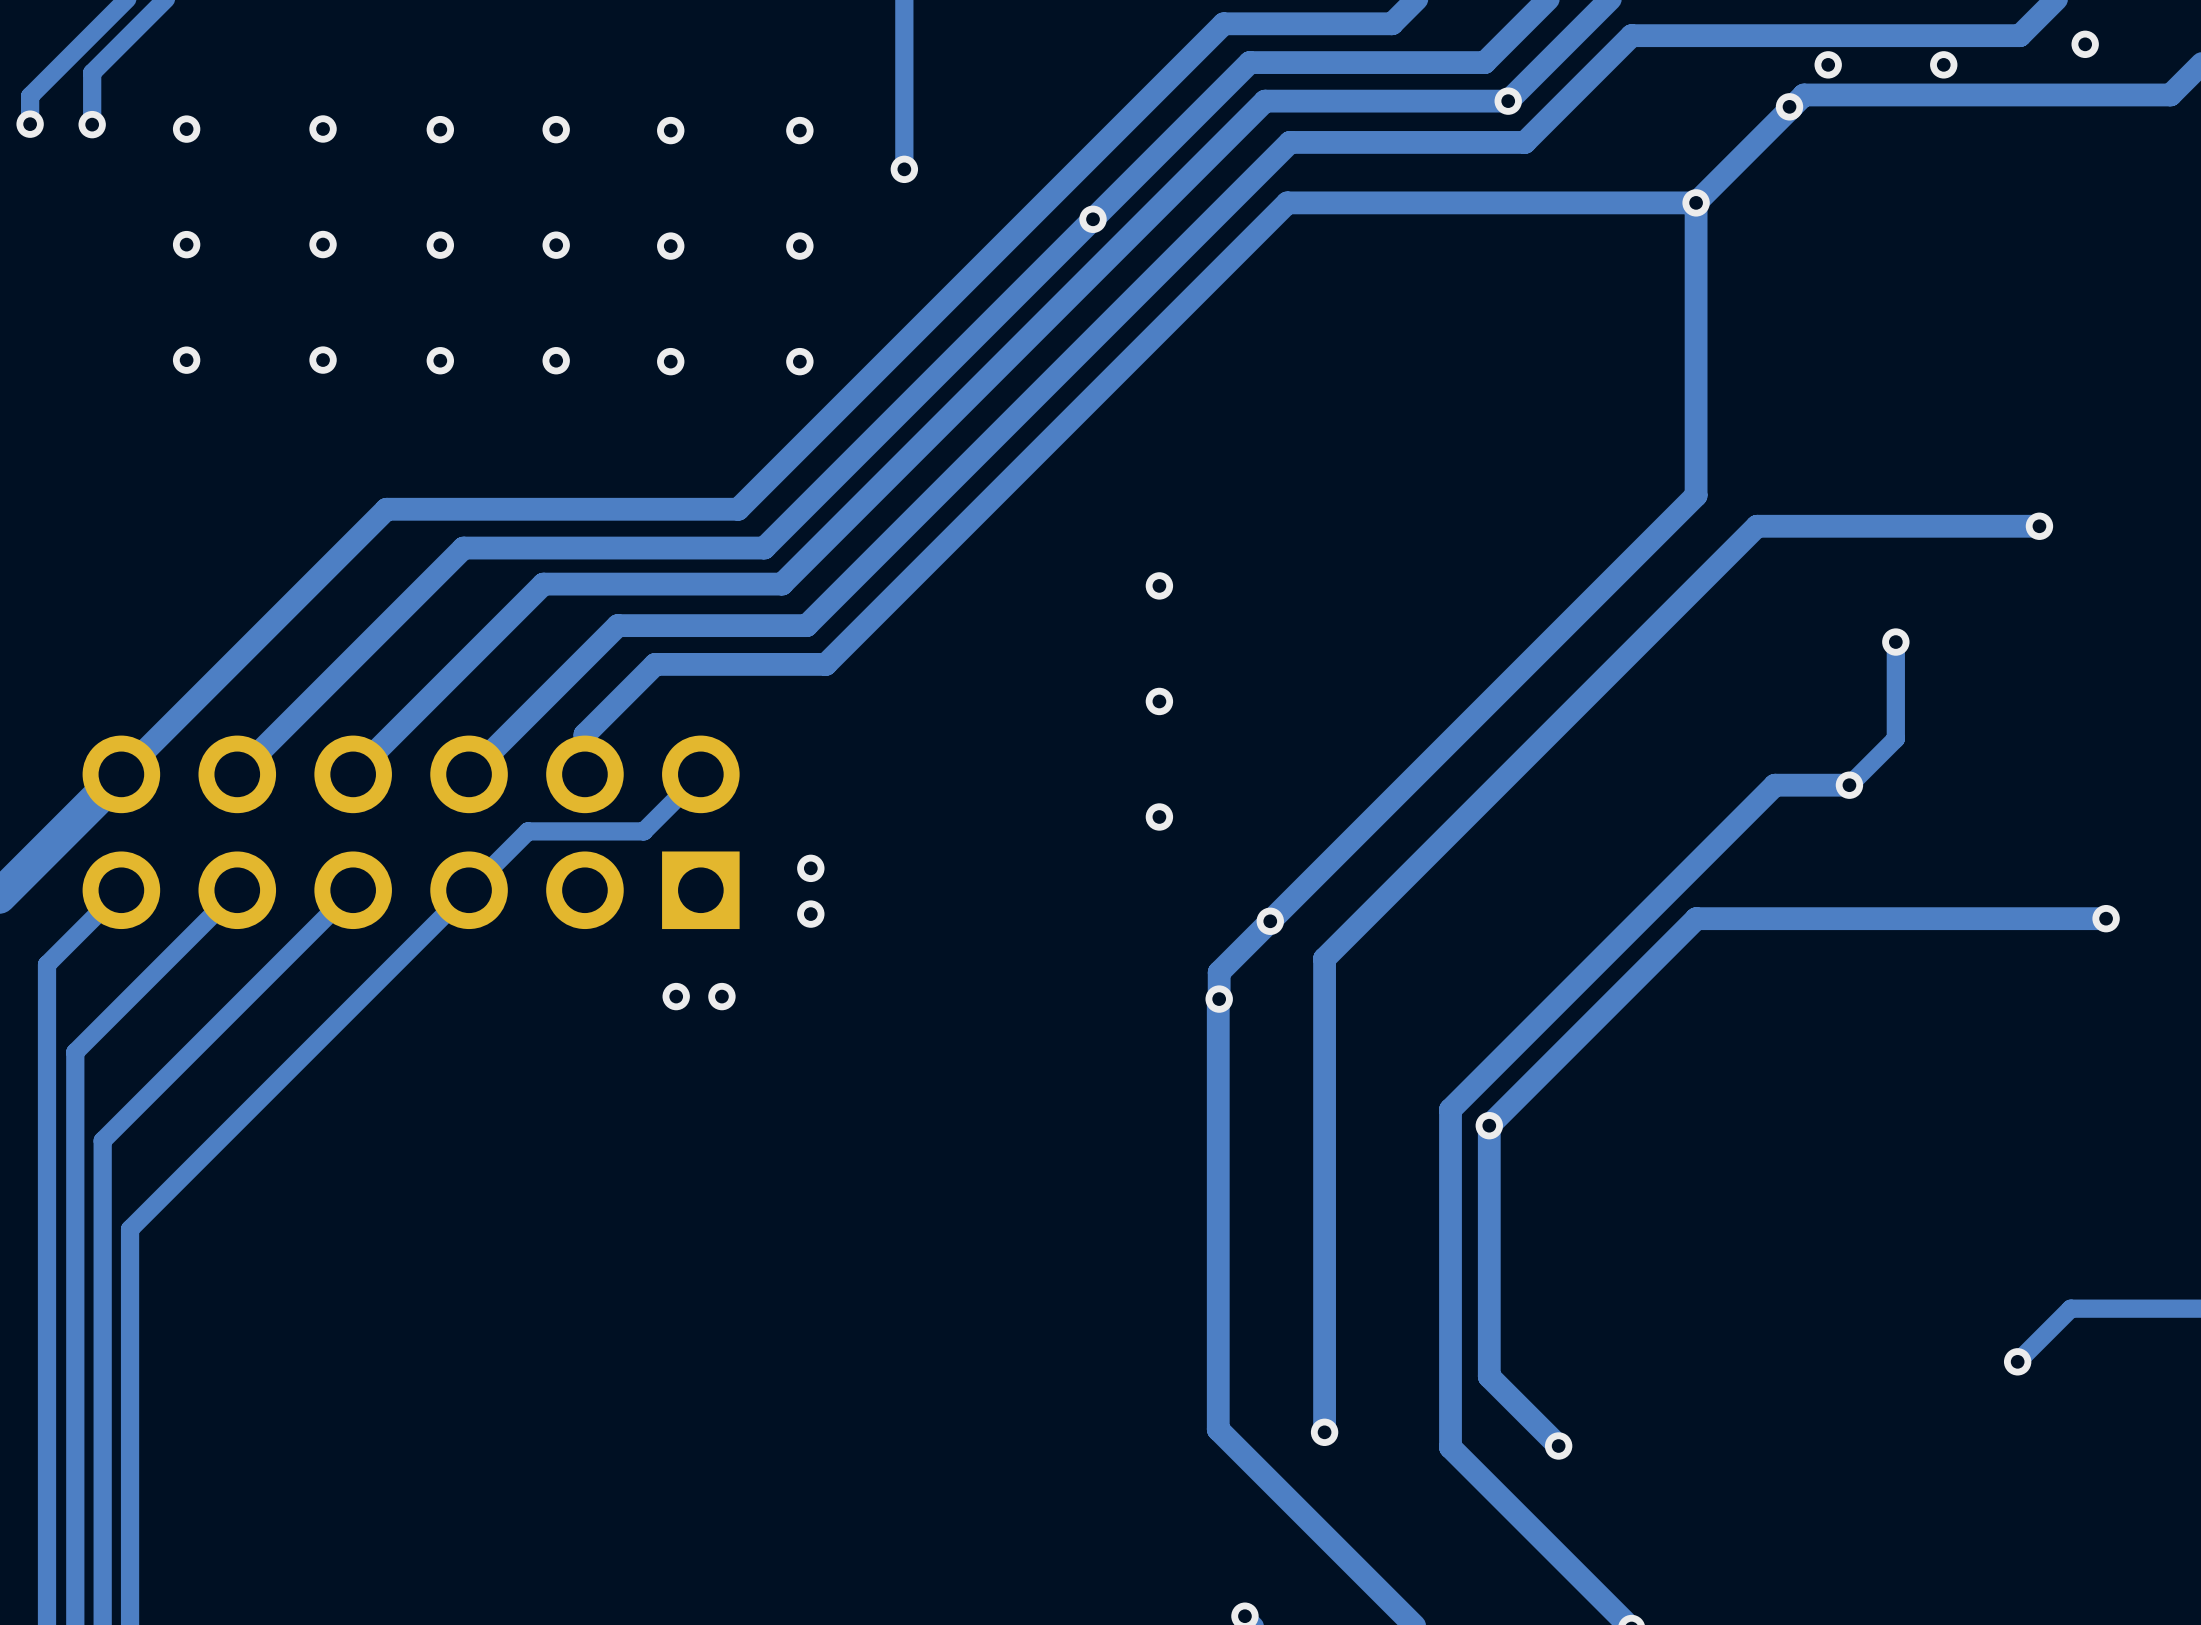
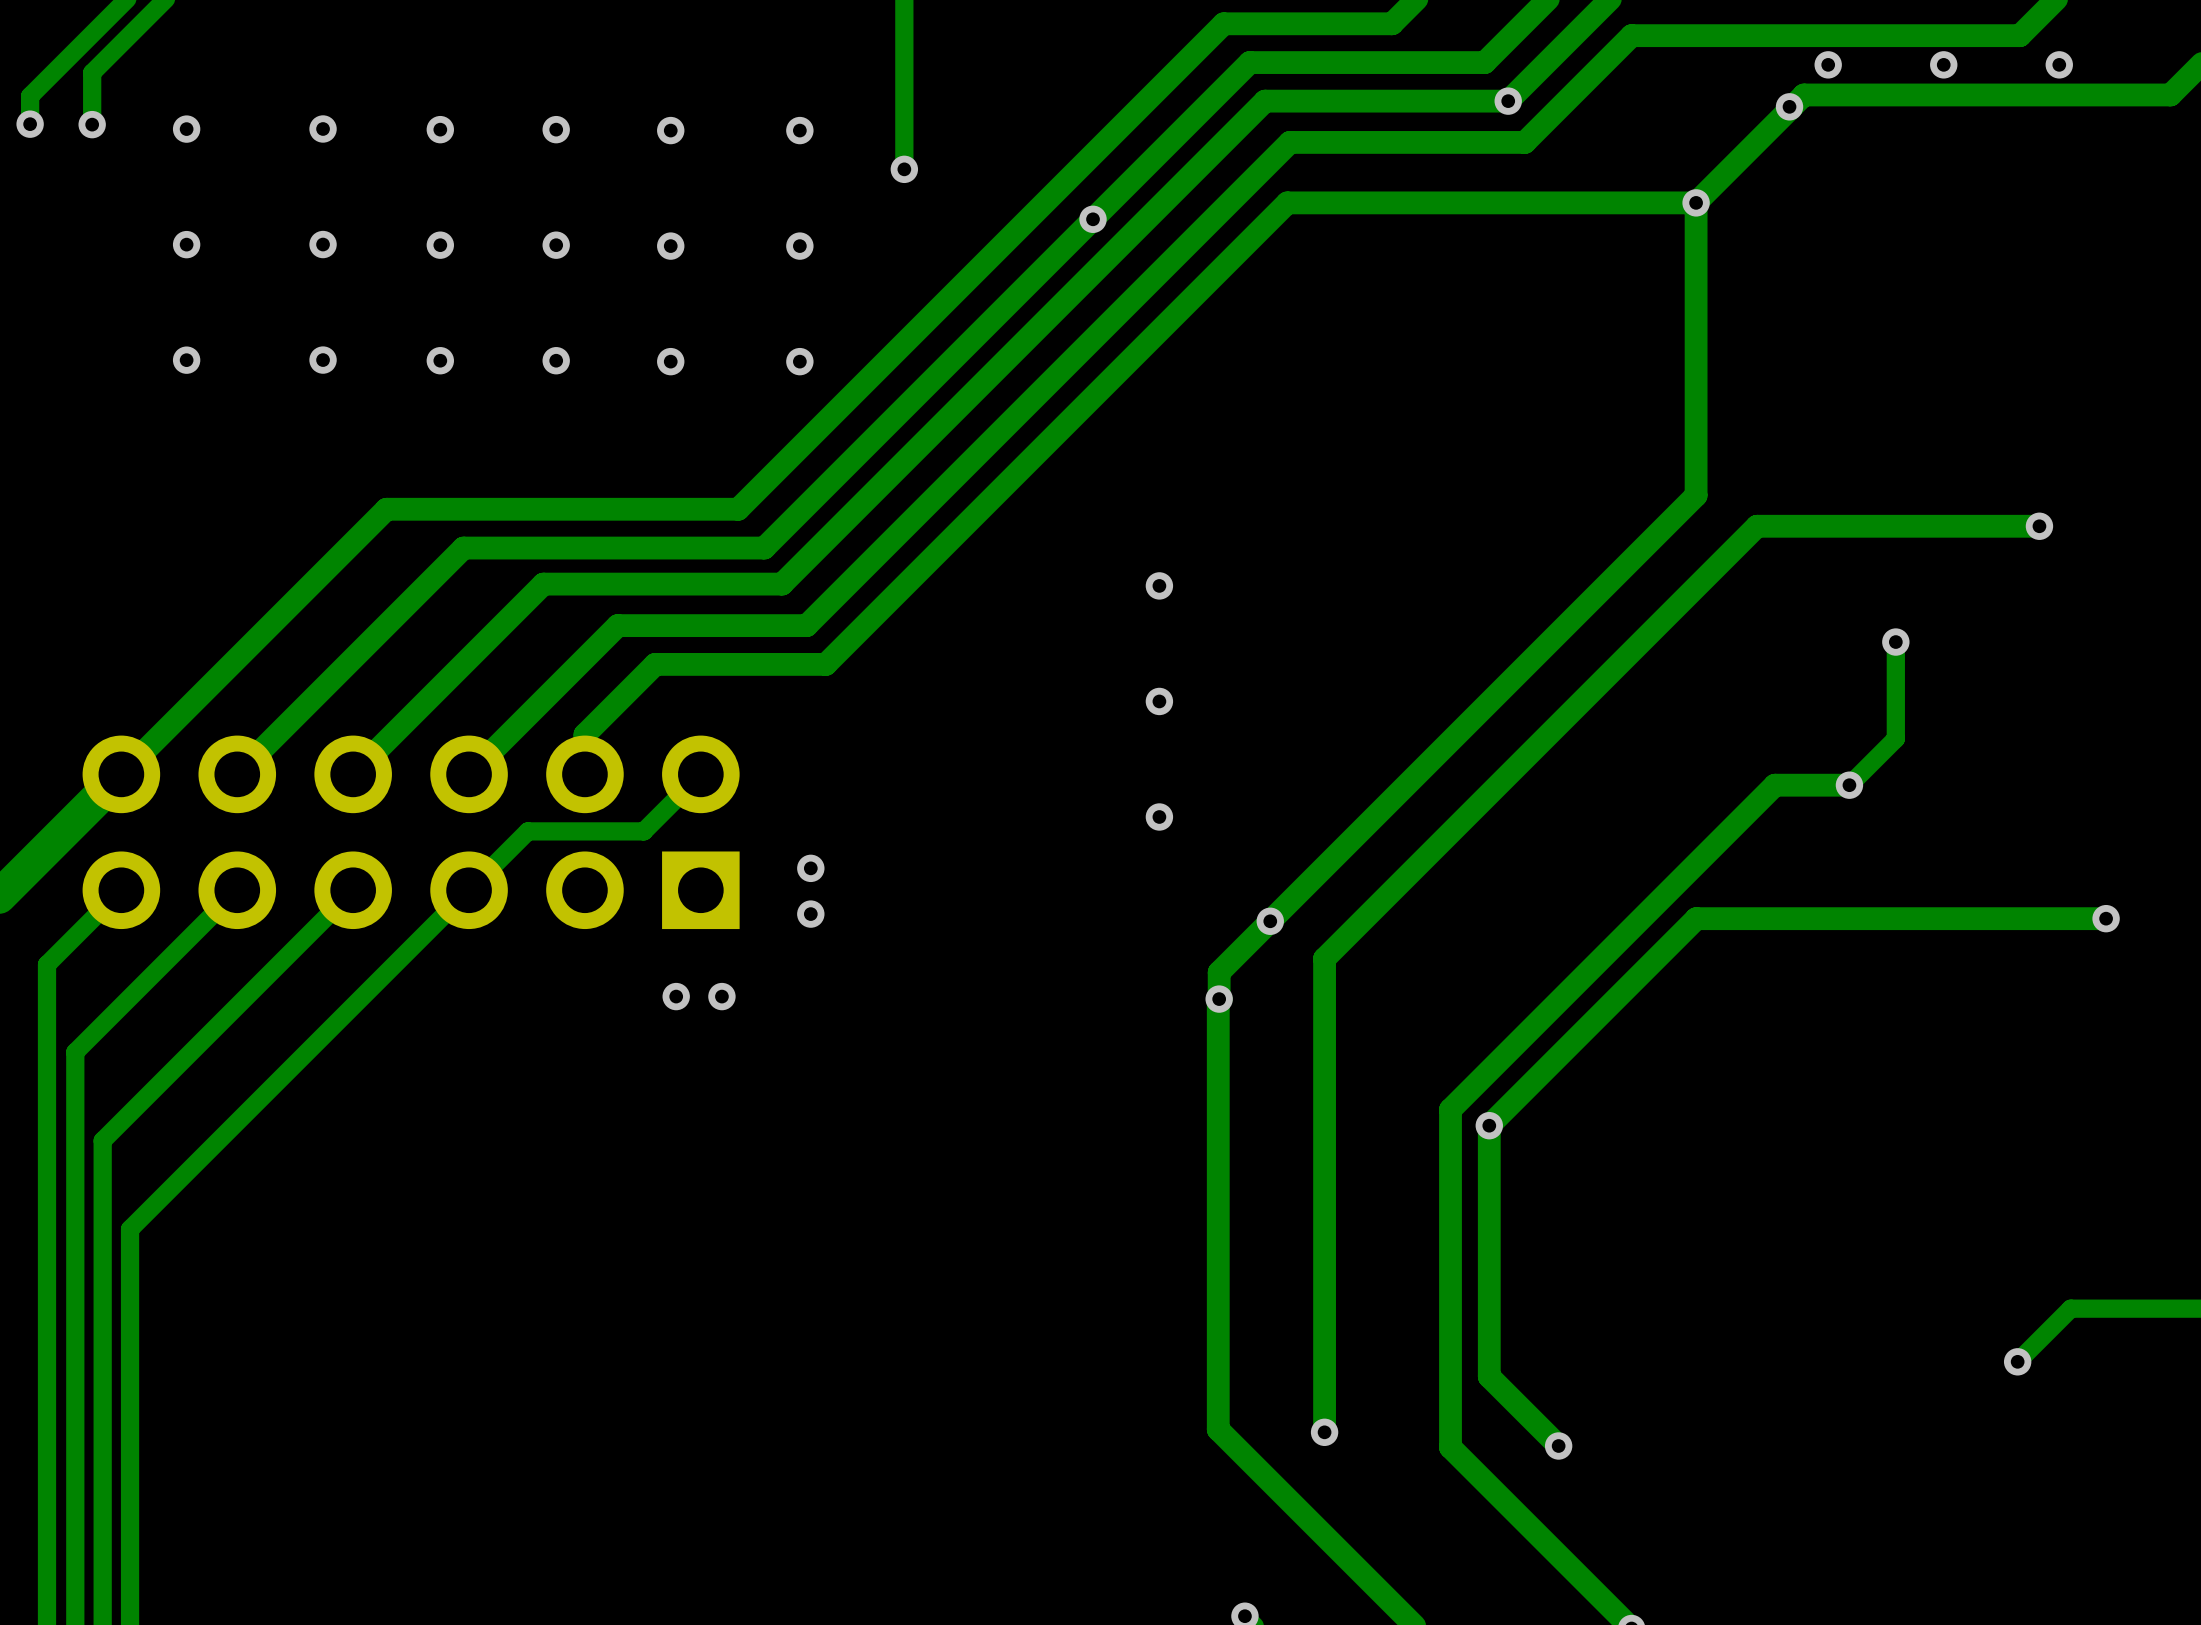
via position: (2085, 44) -> (2059, 64)

